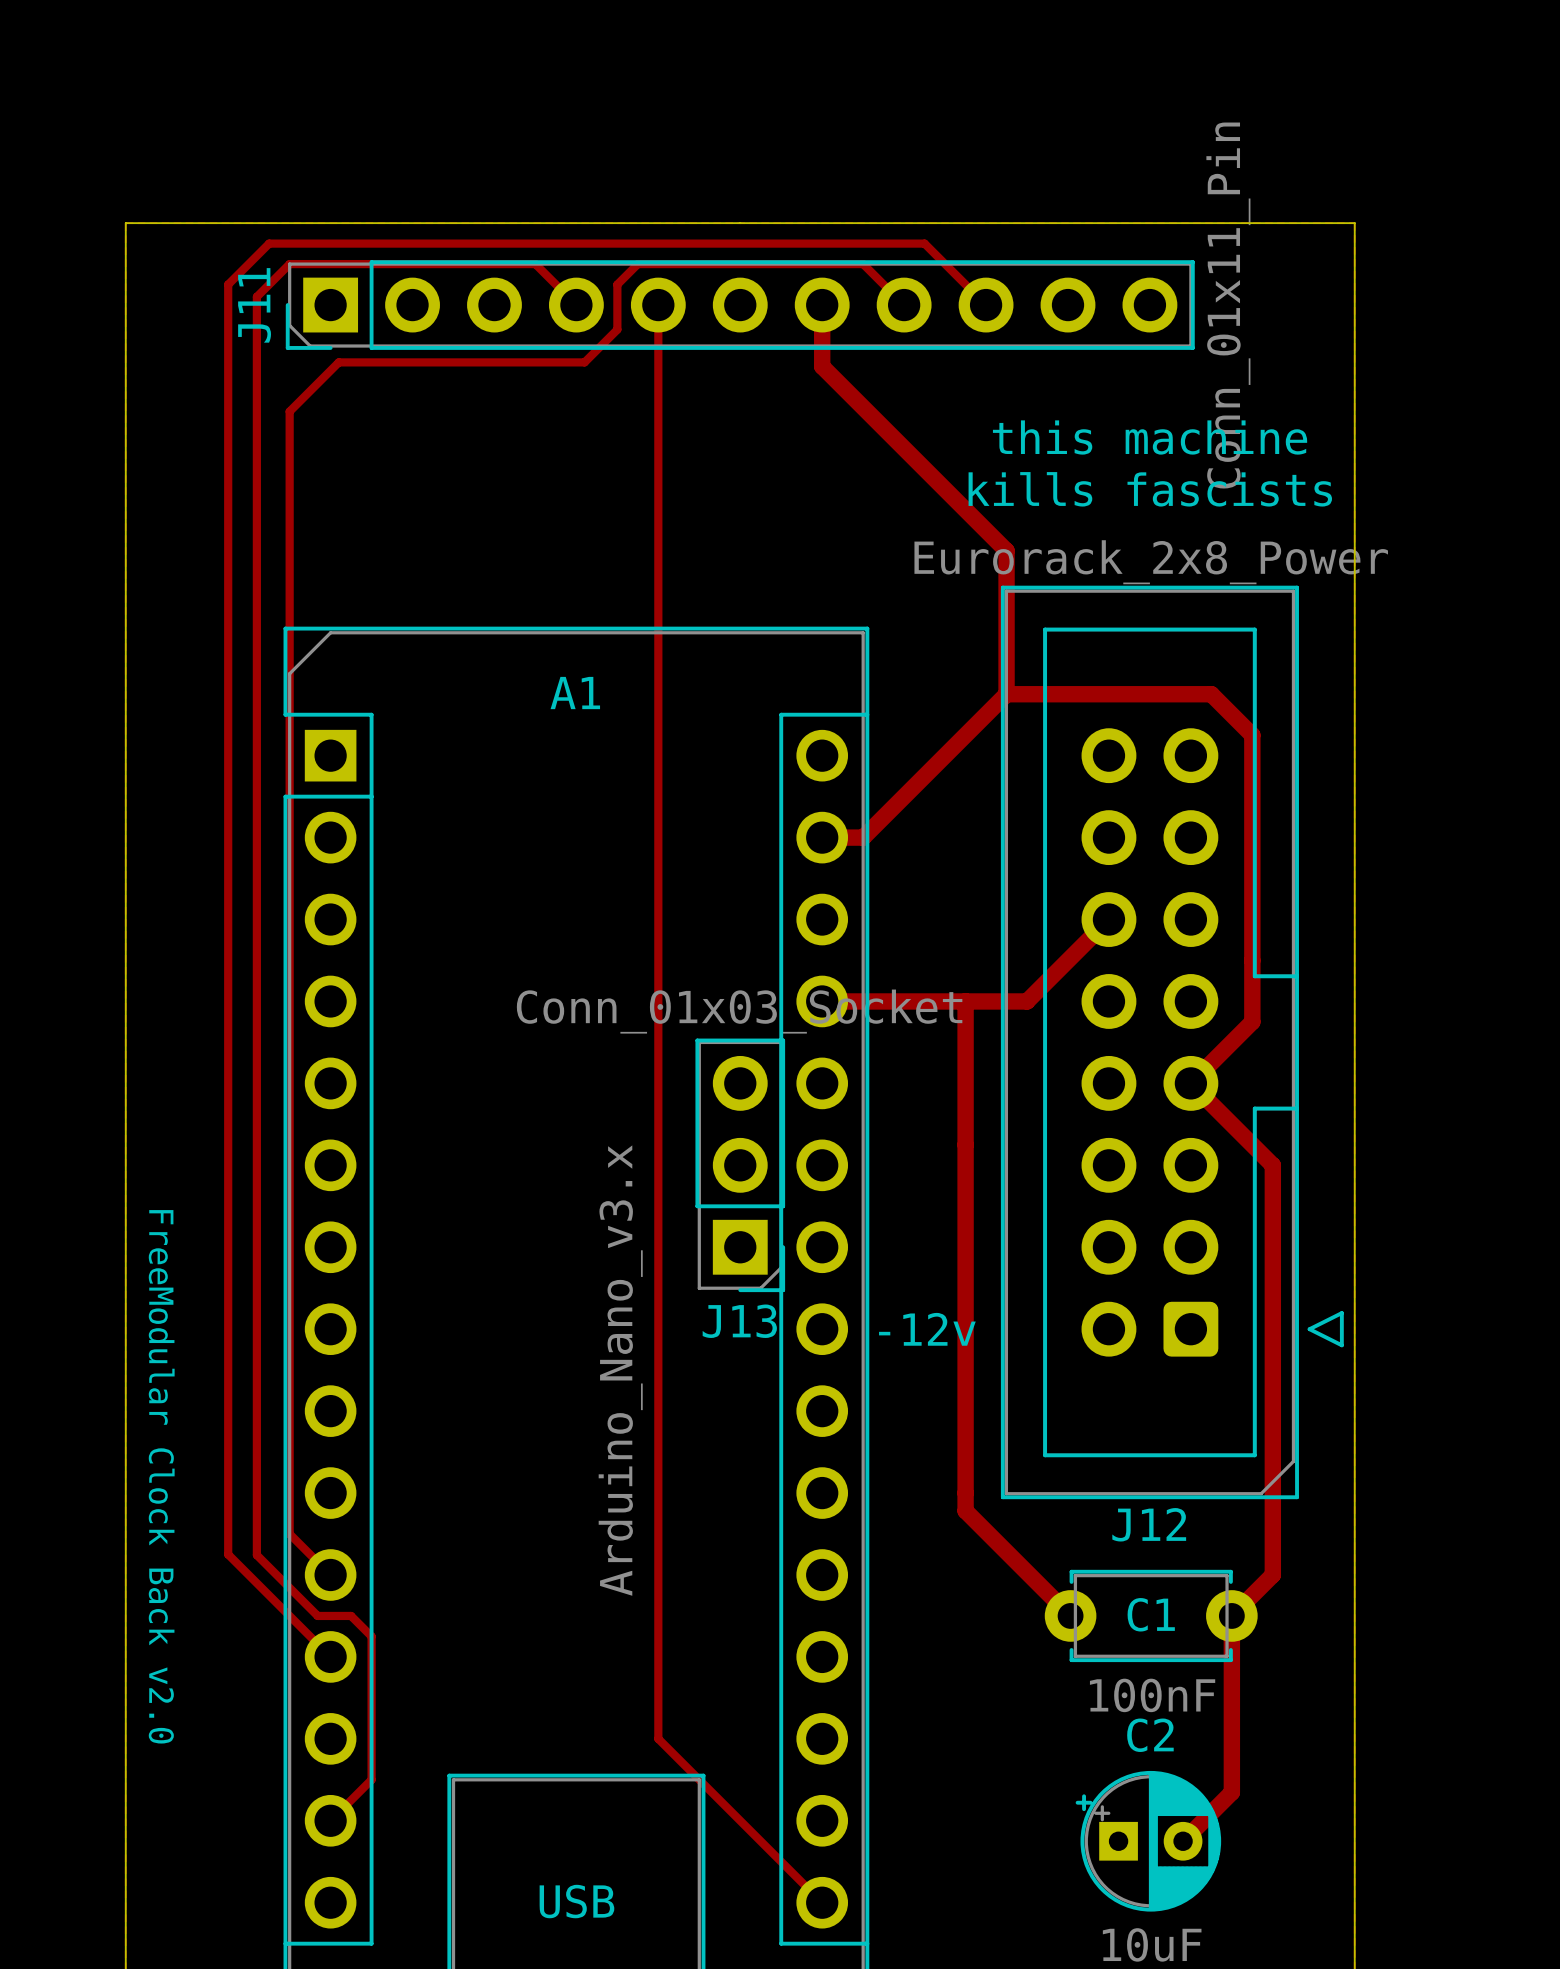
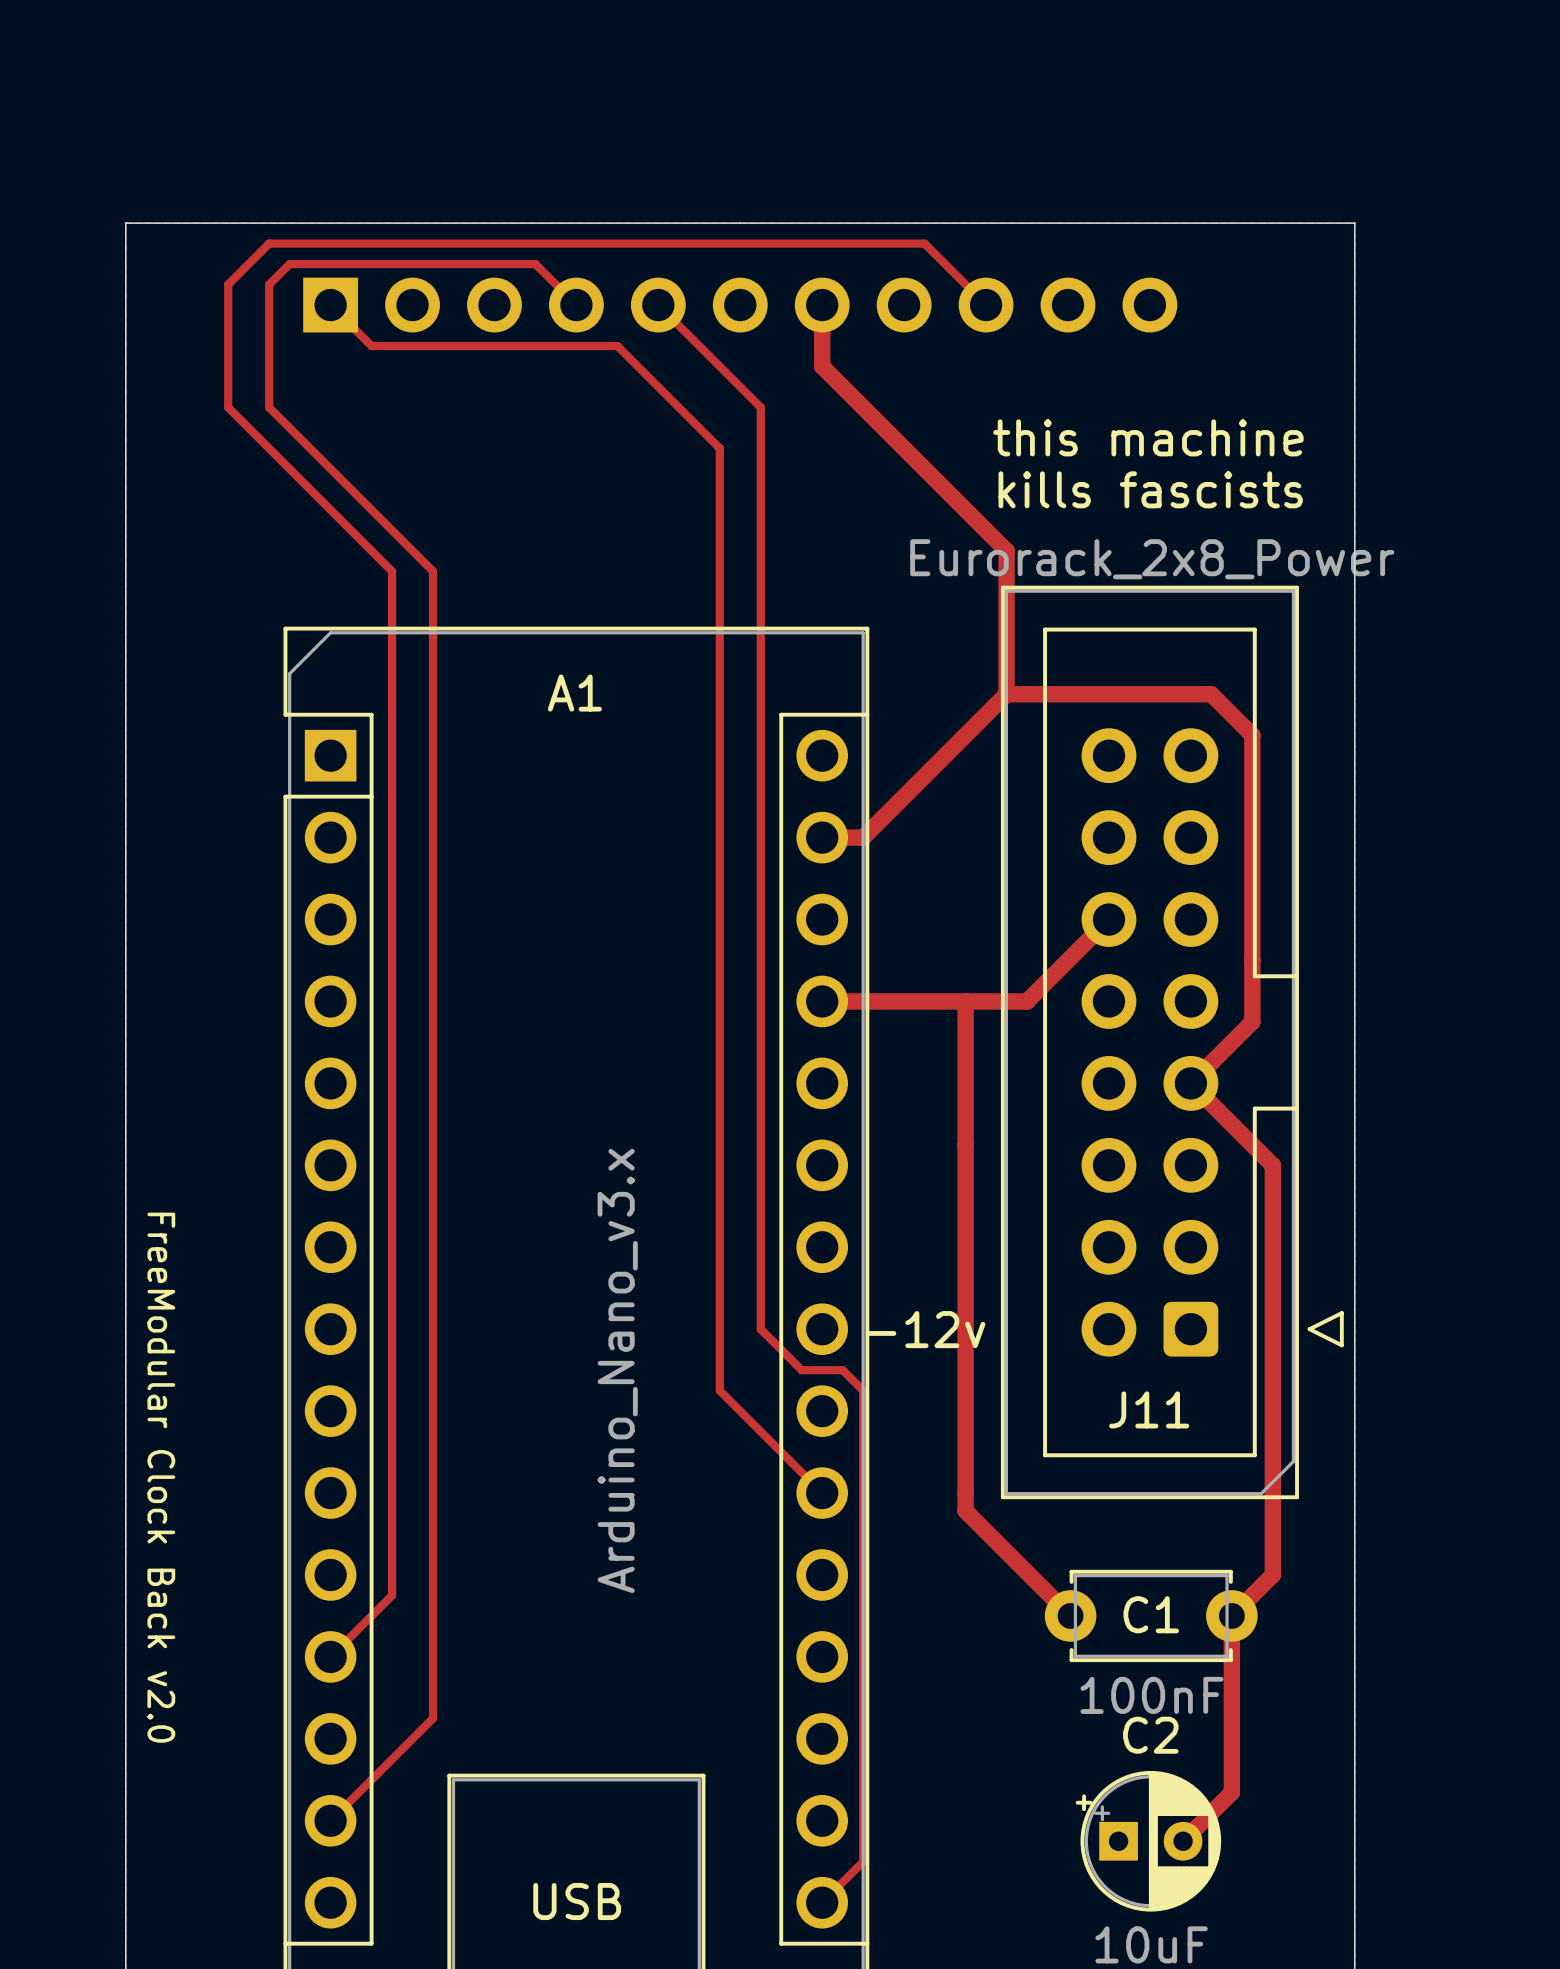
track: (269, 284) (256, 296) (256, 1555) (317, 1615) (351, 1615) (371, 1636) (371, 1779) -> (269, 284) (269, 407) (433, 571) (433, 1718) (371, 1779)
track: none -> (330, 305) (371, 346) (617, 346) (719, 448) (719, 1390) (822, 1493)
track: (658, 305) (658, 1738) (822, 1902) -> (658, 305) (760, 407) (760, 1329) (801, 1370) (842, 1370) (863, 1390) (863, 1861) (822, 1902)
J11 side: top (740, 305) -> bottom (740, 305)
track: (904, 305) (863, 264) (637, 264) (617, 284) (617, 329) (584, 362) (338, 362) (289, 411) (289, 1534) (330, 1574) -> none
track: (228, 407) (228, 1554) (330, 1656) -> (228, 407) (392, 571) (392, 1595) (330, 1656)
J13: Conn_01x03_Socket (740, 1165) -> none
J12 name: J12 (1149, 1524) -> J11 (1149, 1409)

